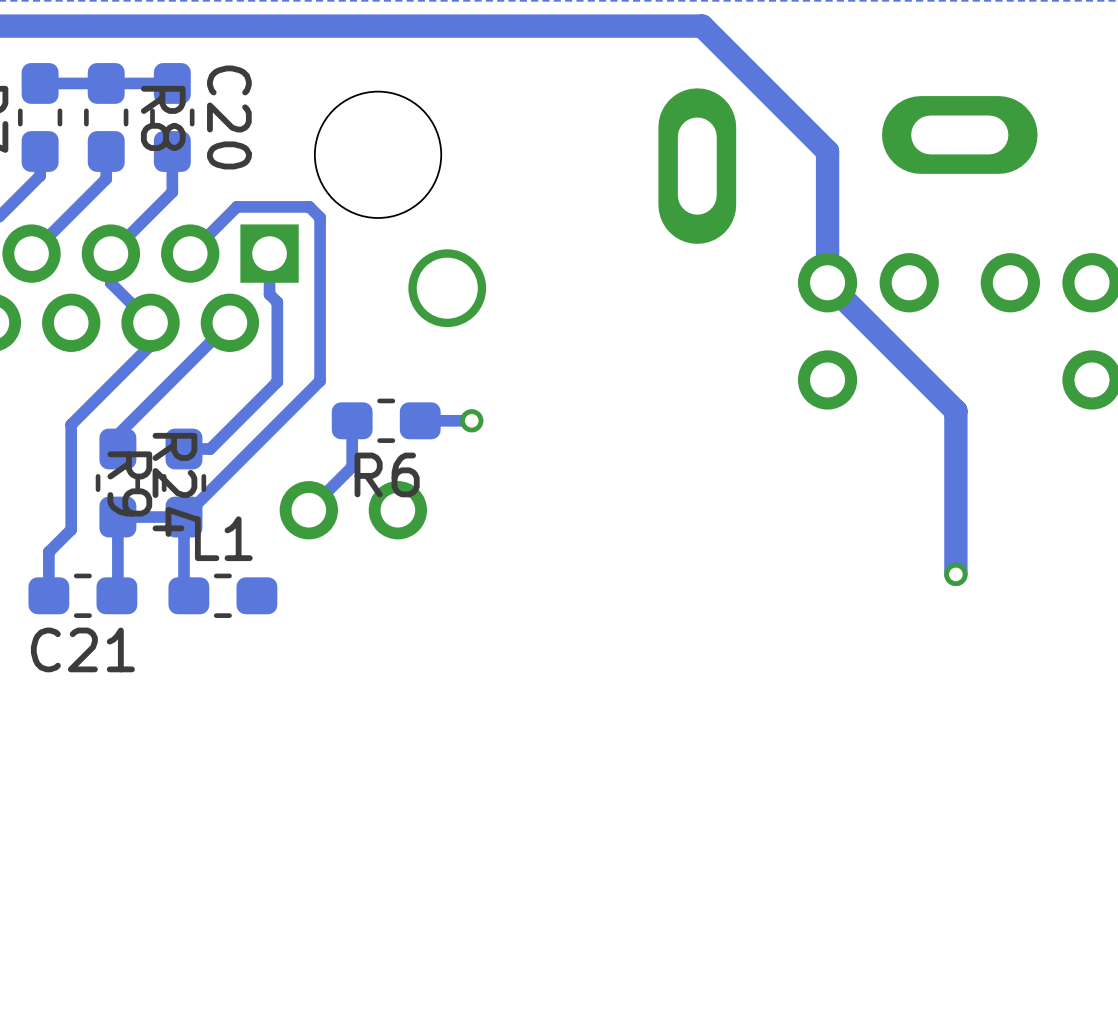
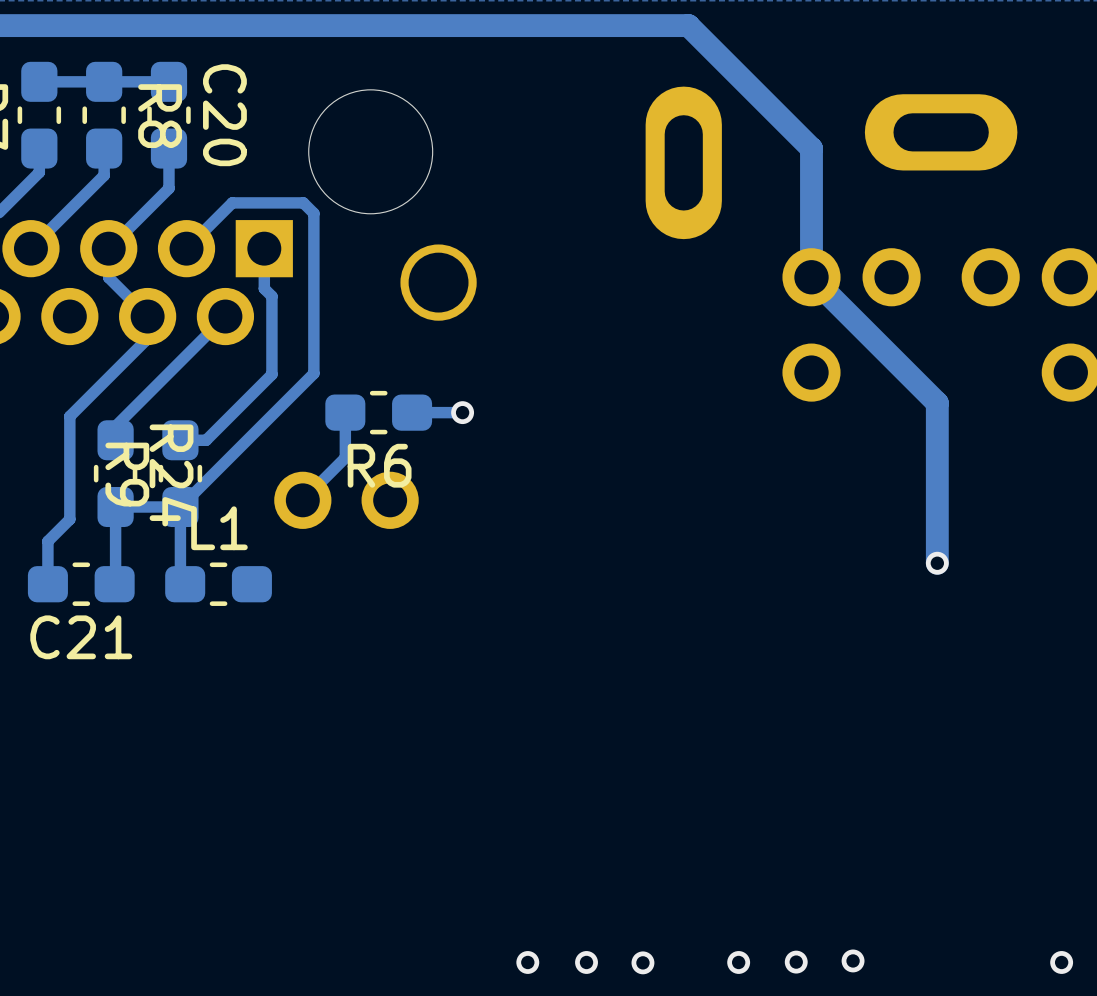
via: none -> (853, 960)
via: none -> (527, 962)
via: none -> (586, 962)
via: none -> (642, 962)
via: none -> (738, 962)
via: none -> (796, 962)
via: none -> (1061, 962)

